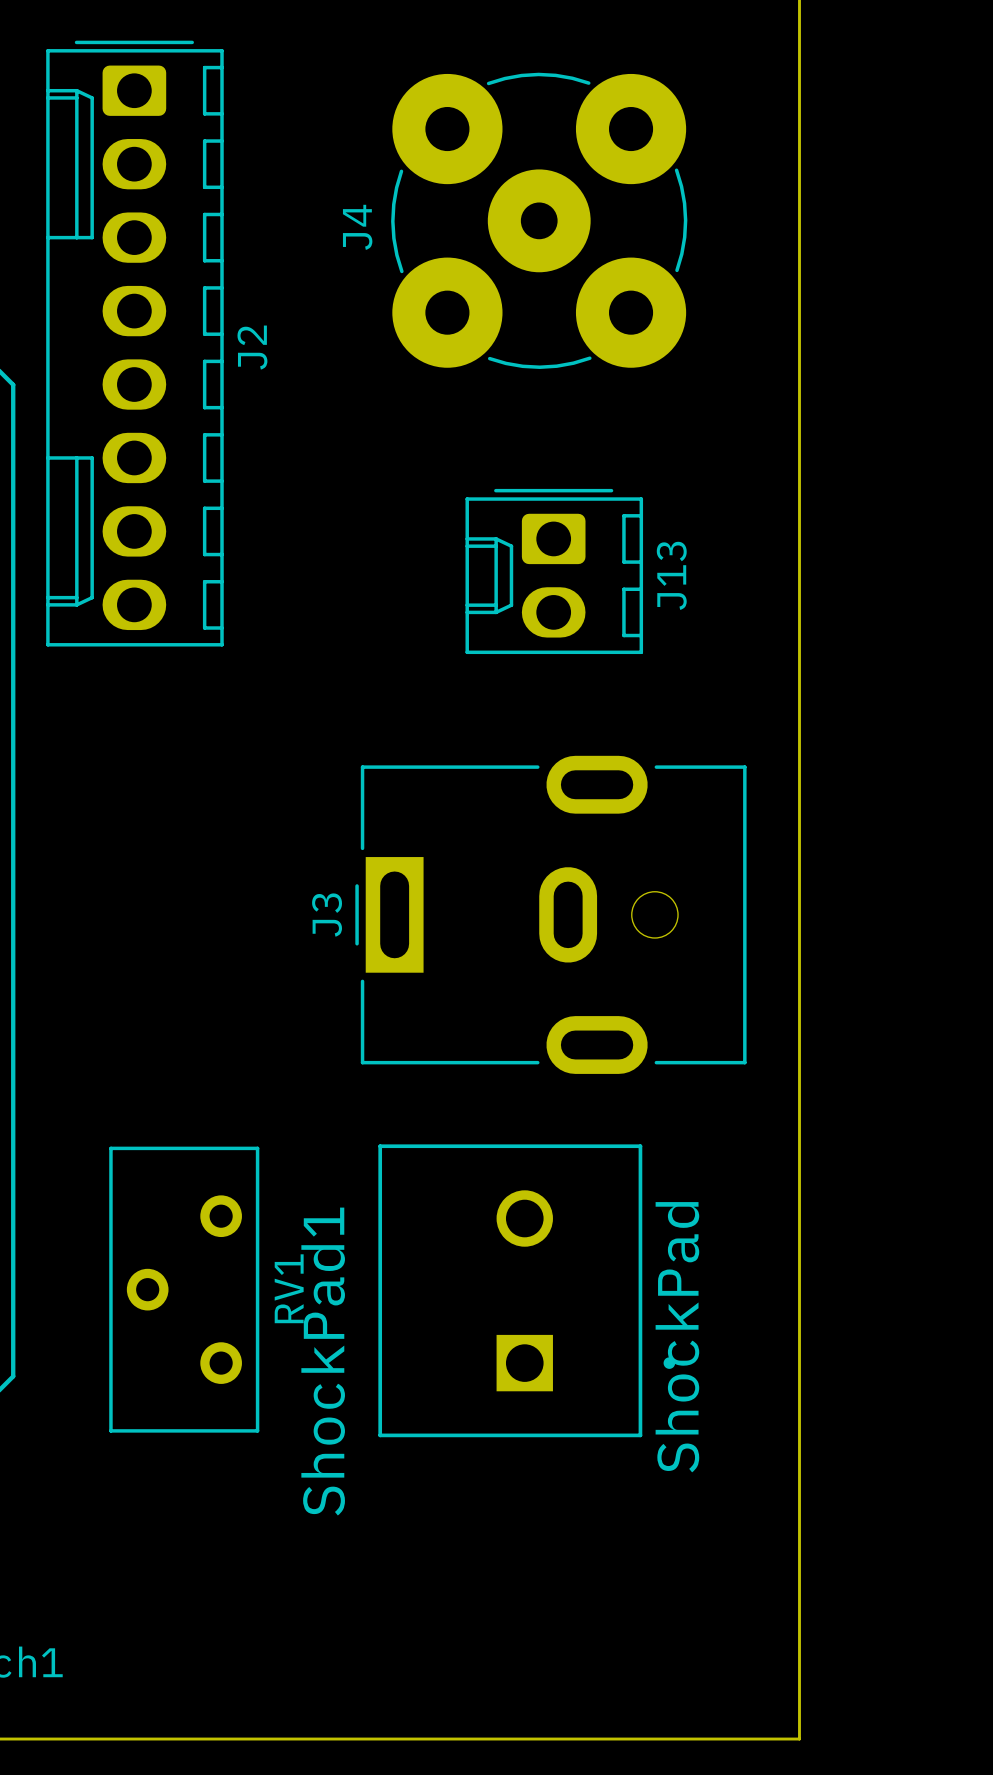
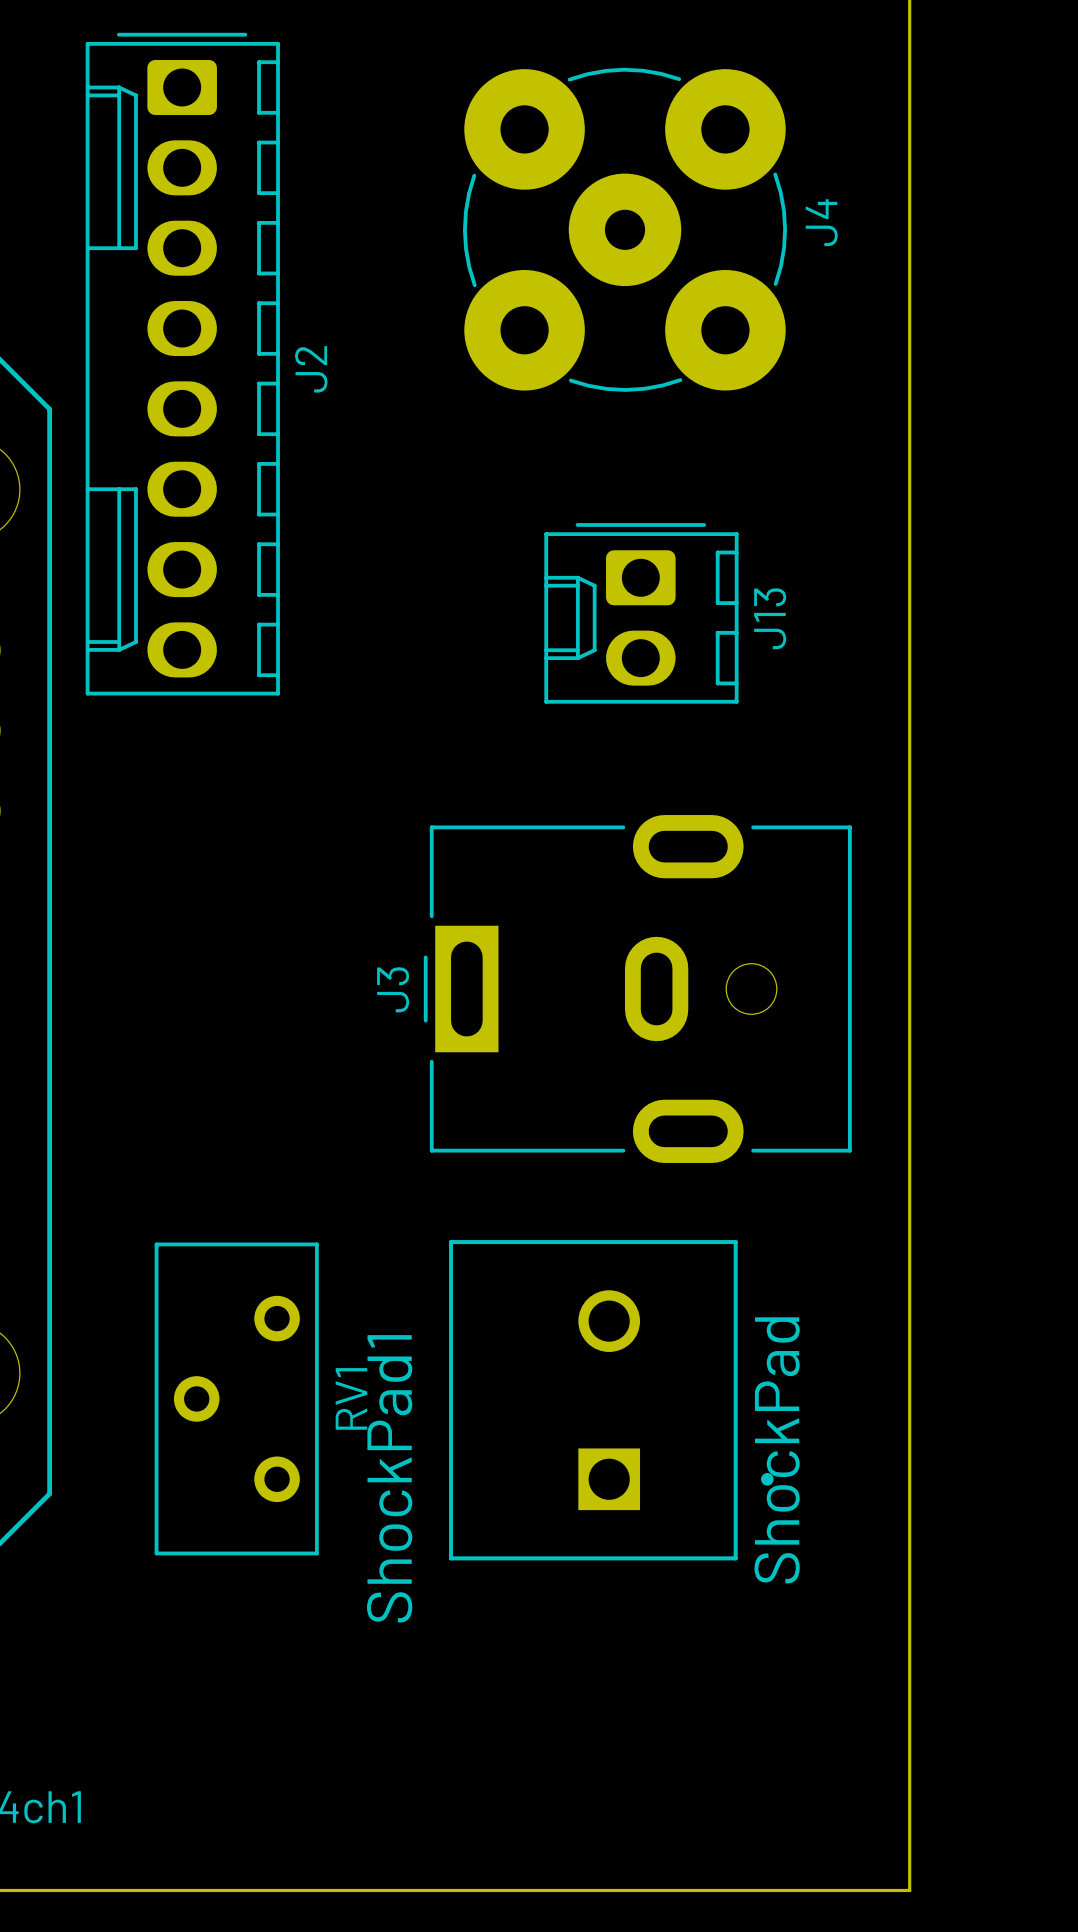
J4 name position: J4 (357, 227) -> J4 (821, 222)

